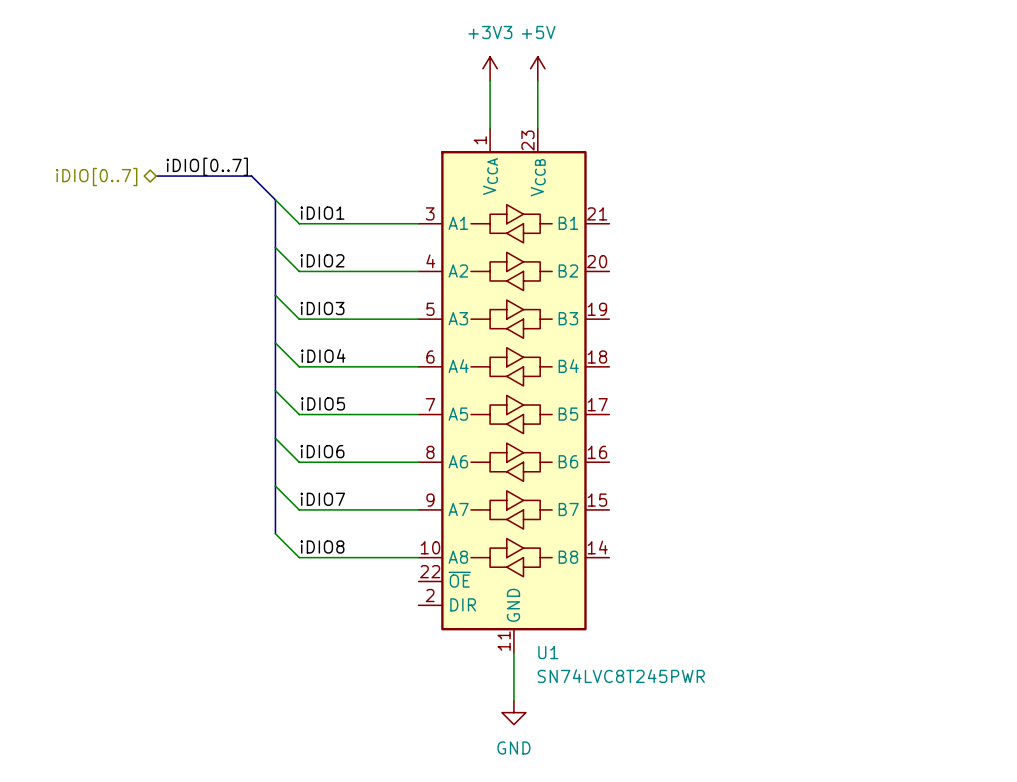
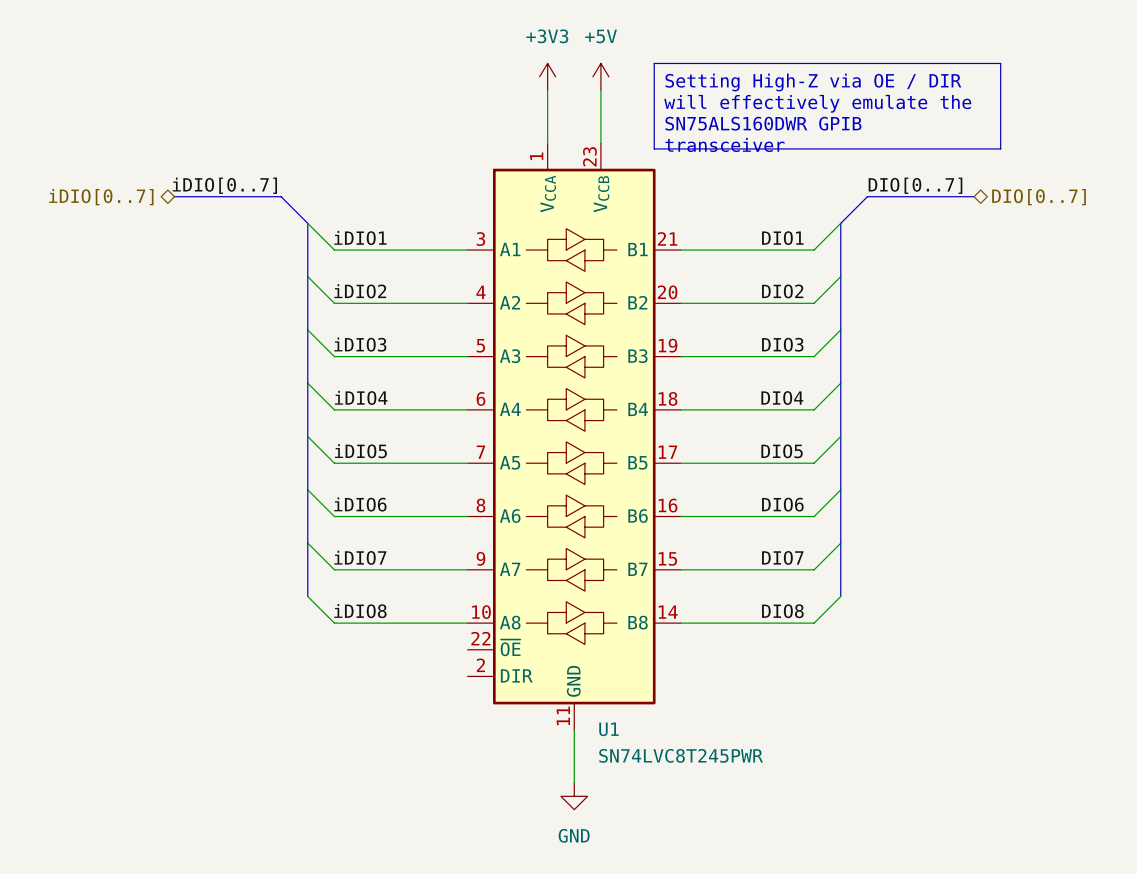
line: none -> (654, 63) (1000, 63) (1000, 148) (654, 148) (654, 63)
text: none -> Setting High-Z via OE / DIR (813, 82)
text: none -> will effectively emulate the (817, 103)
text: none -> SN75ALS160DWR GPIB (763, 123)
text: none -> transceiver (724, 144)
label: none -> DIO[0..7] (915, 185)
bus: none -> (974, 196) (867, 196) (840, 223) (840, 596)
hierarchical label: none -> DIO[0..7] (1039, 197)
wire: none -> (840, 223) (814, 250) (680, 250)
label: none -> DIO1 (782, 238)
wire: none -> (840, 276) (814, 303) (680, 303)
label: none -> DIO2 (782, 291)
wire: none -> (840, 329) (814, 356) (680, 356)
label: none -> DIO3 (782, 344)
wire: none -> (840, 383) (814, 409) (680, 409)
label: none -> DIO4 (782, 398)
wire: none -> (840, 436) (814, 463) (681, 463)
label: none -> DIO5 (782, 451)
wire: none -> (840, 489) (814, 516) (680, 516)
label: none -> DIO6 (782, 504)
wire: none -> (840, 543) (814, 569) (680, 569)
label: none -> DIO7 (782, 557)
wire: none -> (840, 596) (814, 623) (680, 623)
label: none -> DIO8 (782, 611)

